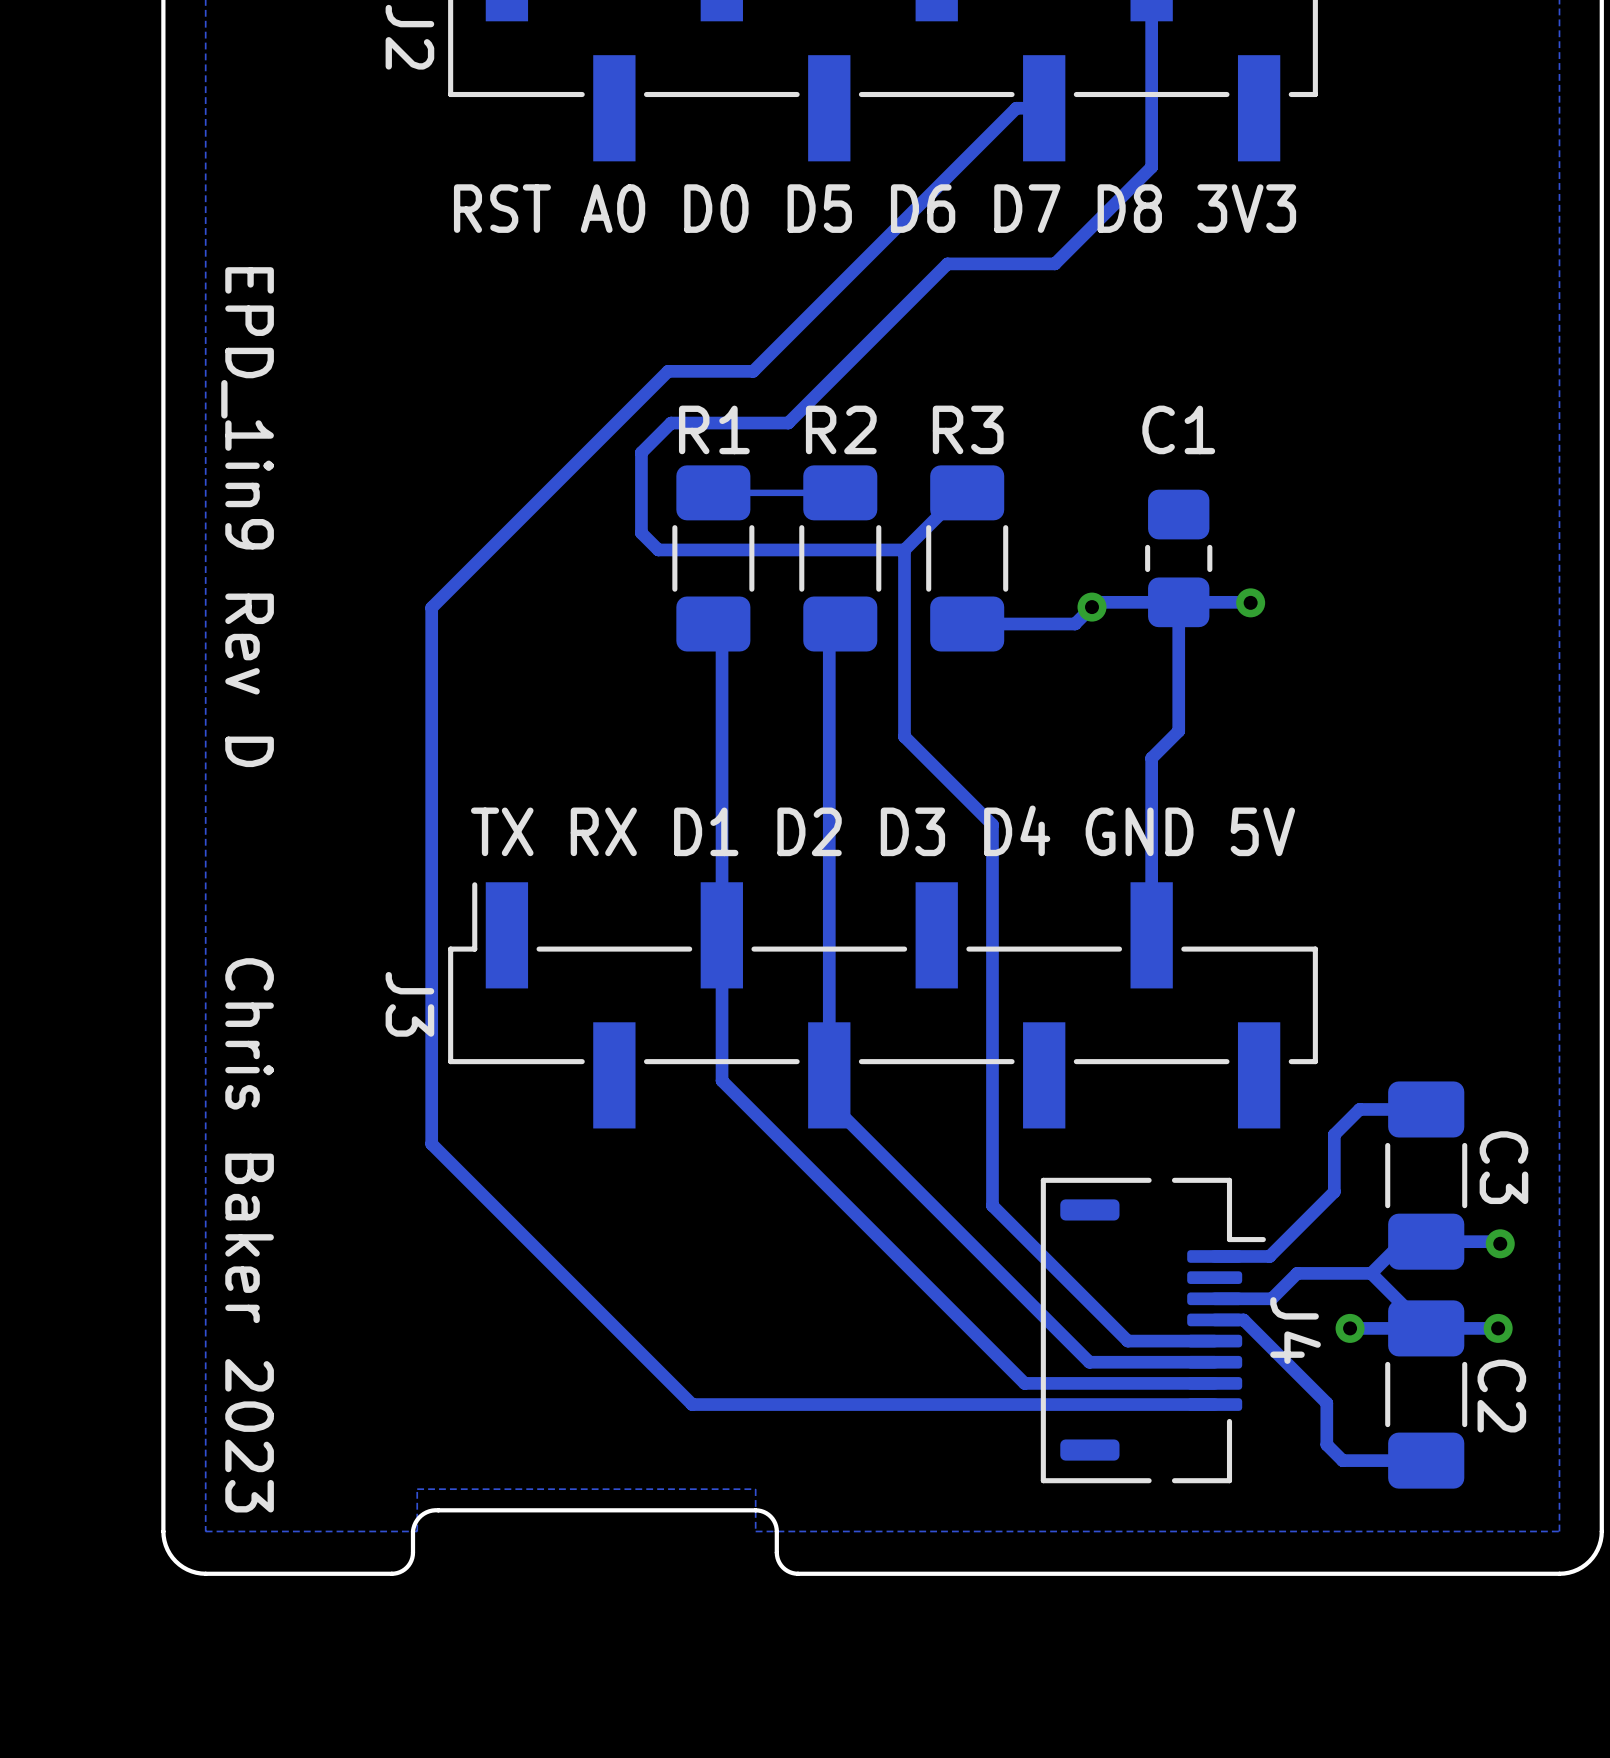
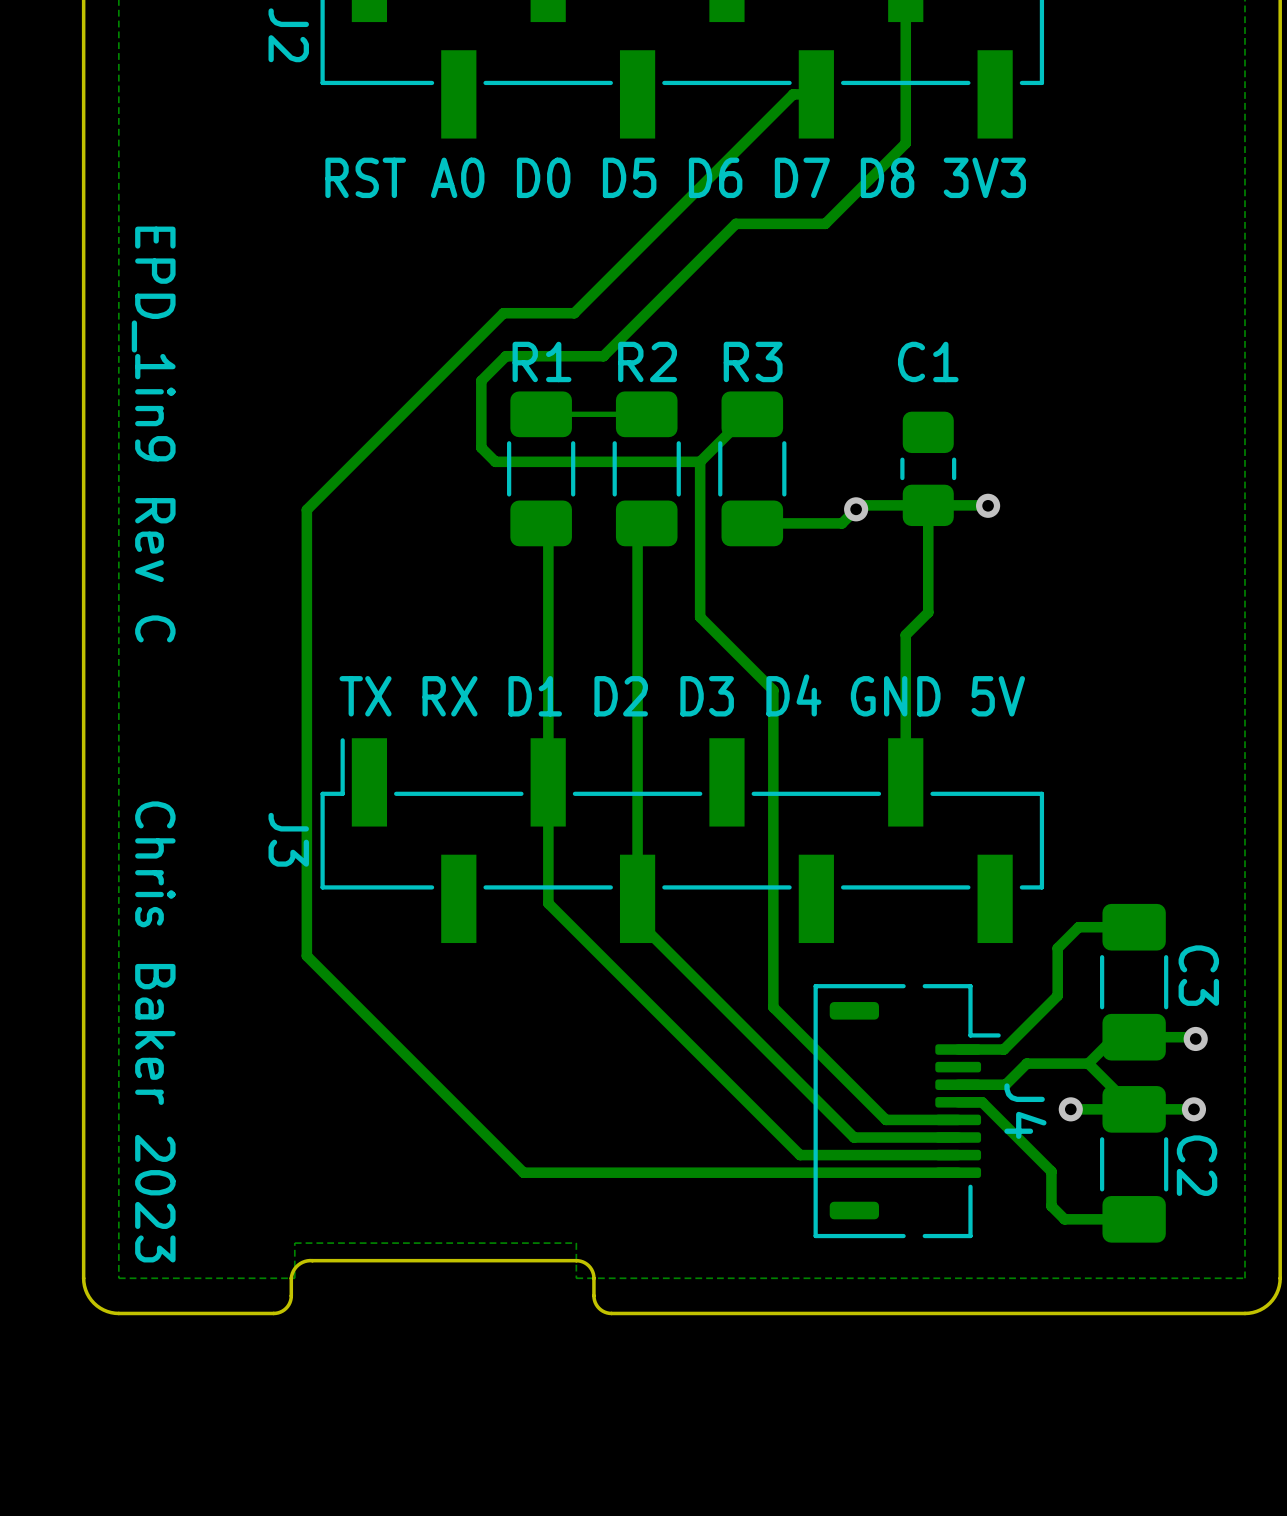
text: EPD_1in9 Rev D (247, 517) -> EPD_1in9 Rev C (153, 434)

